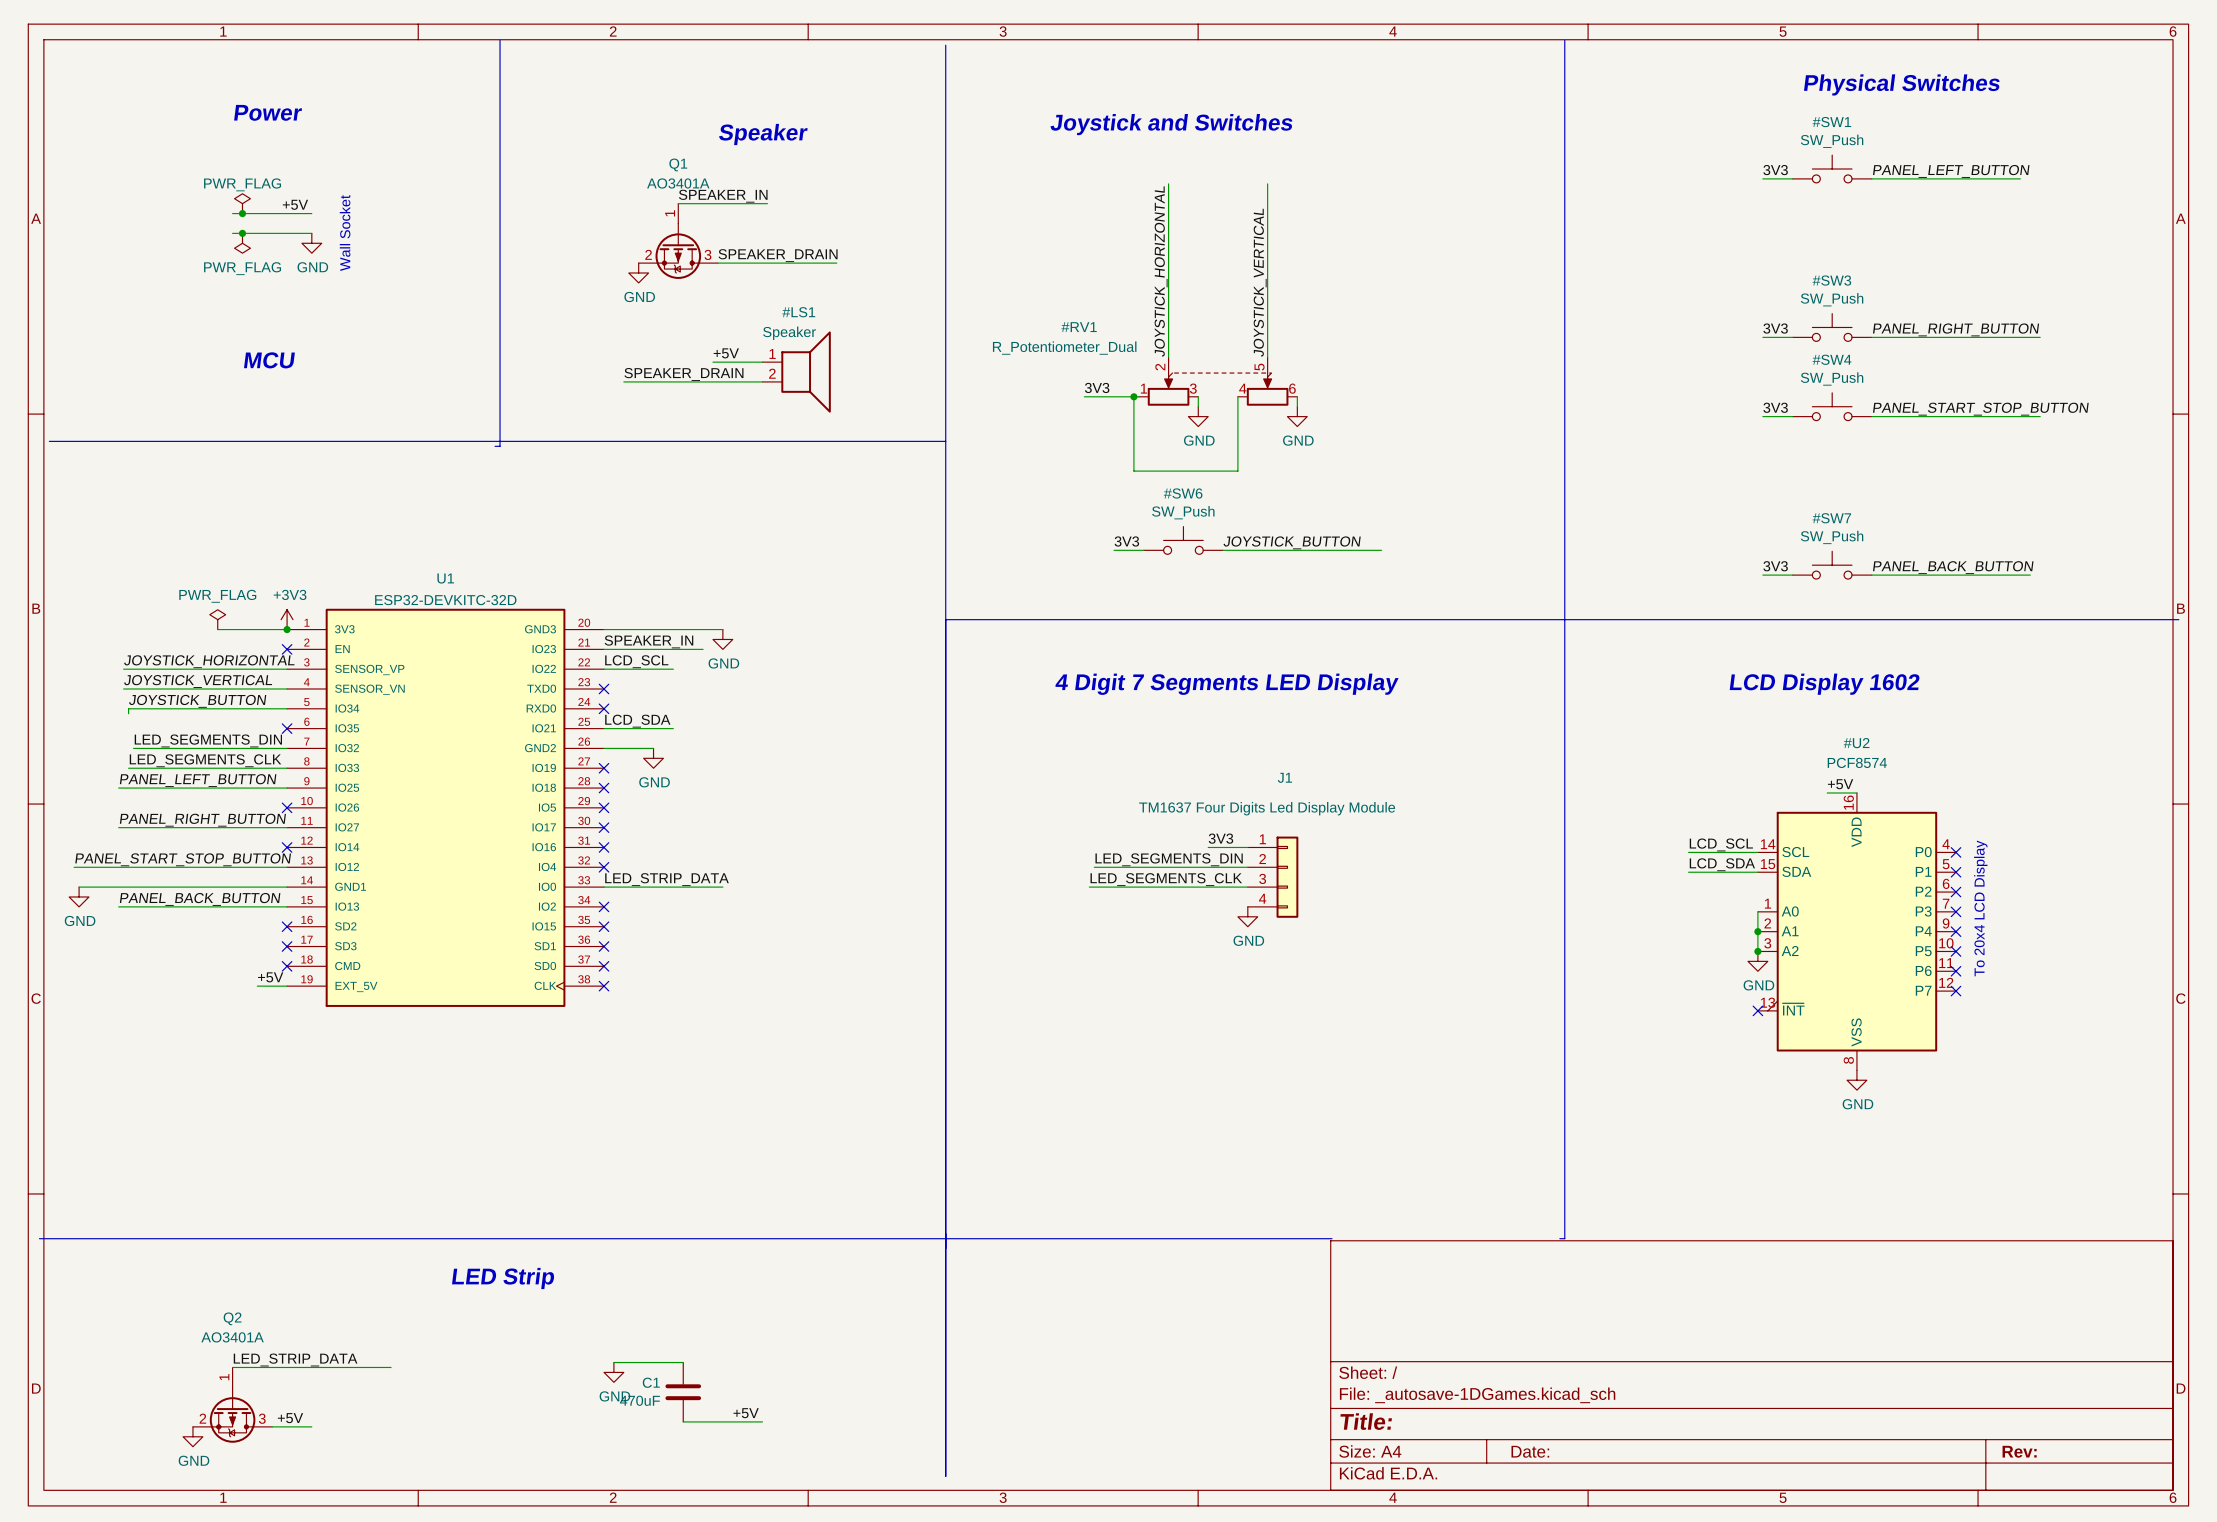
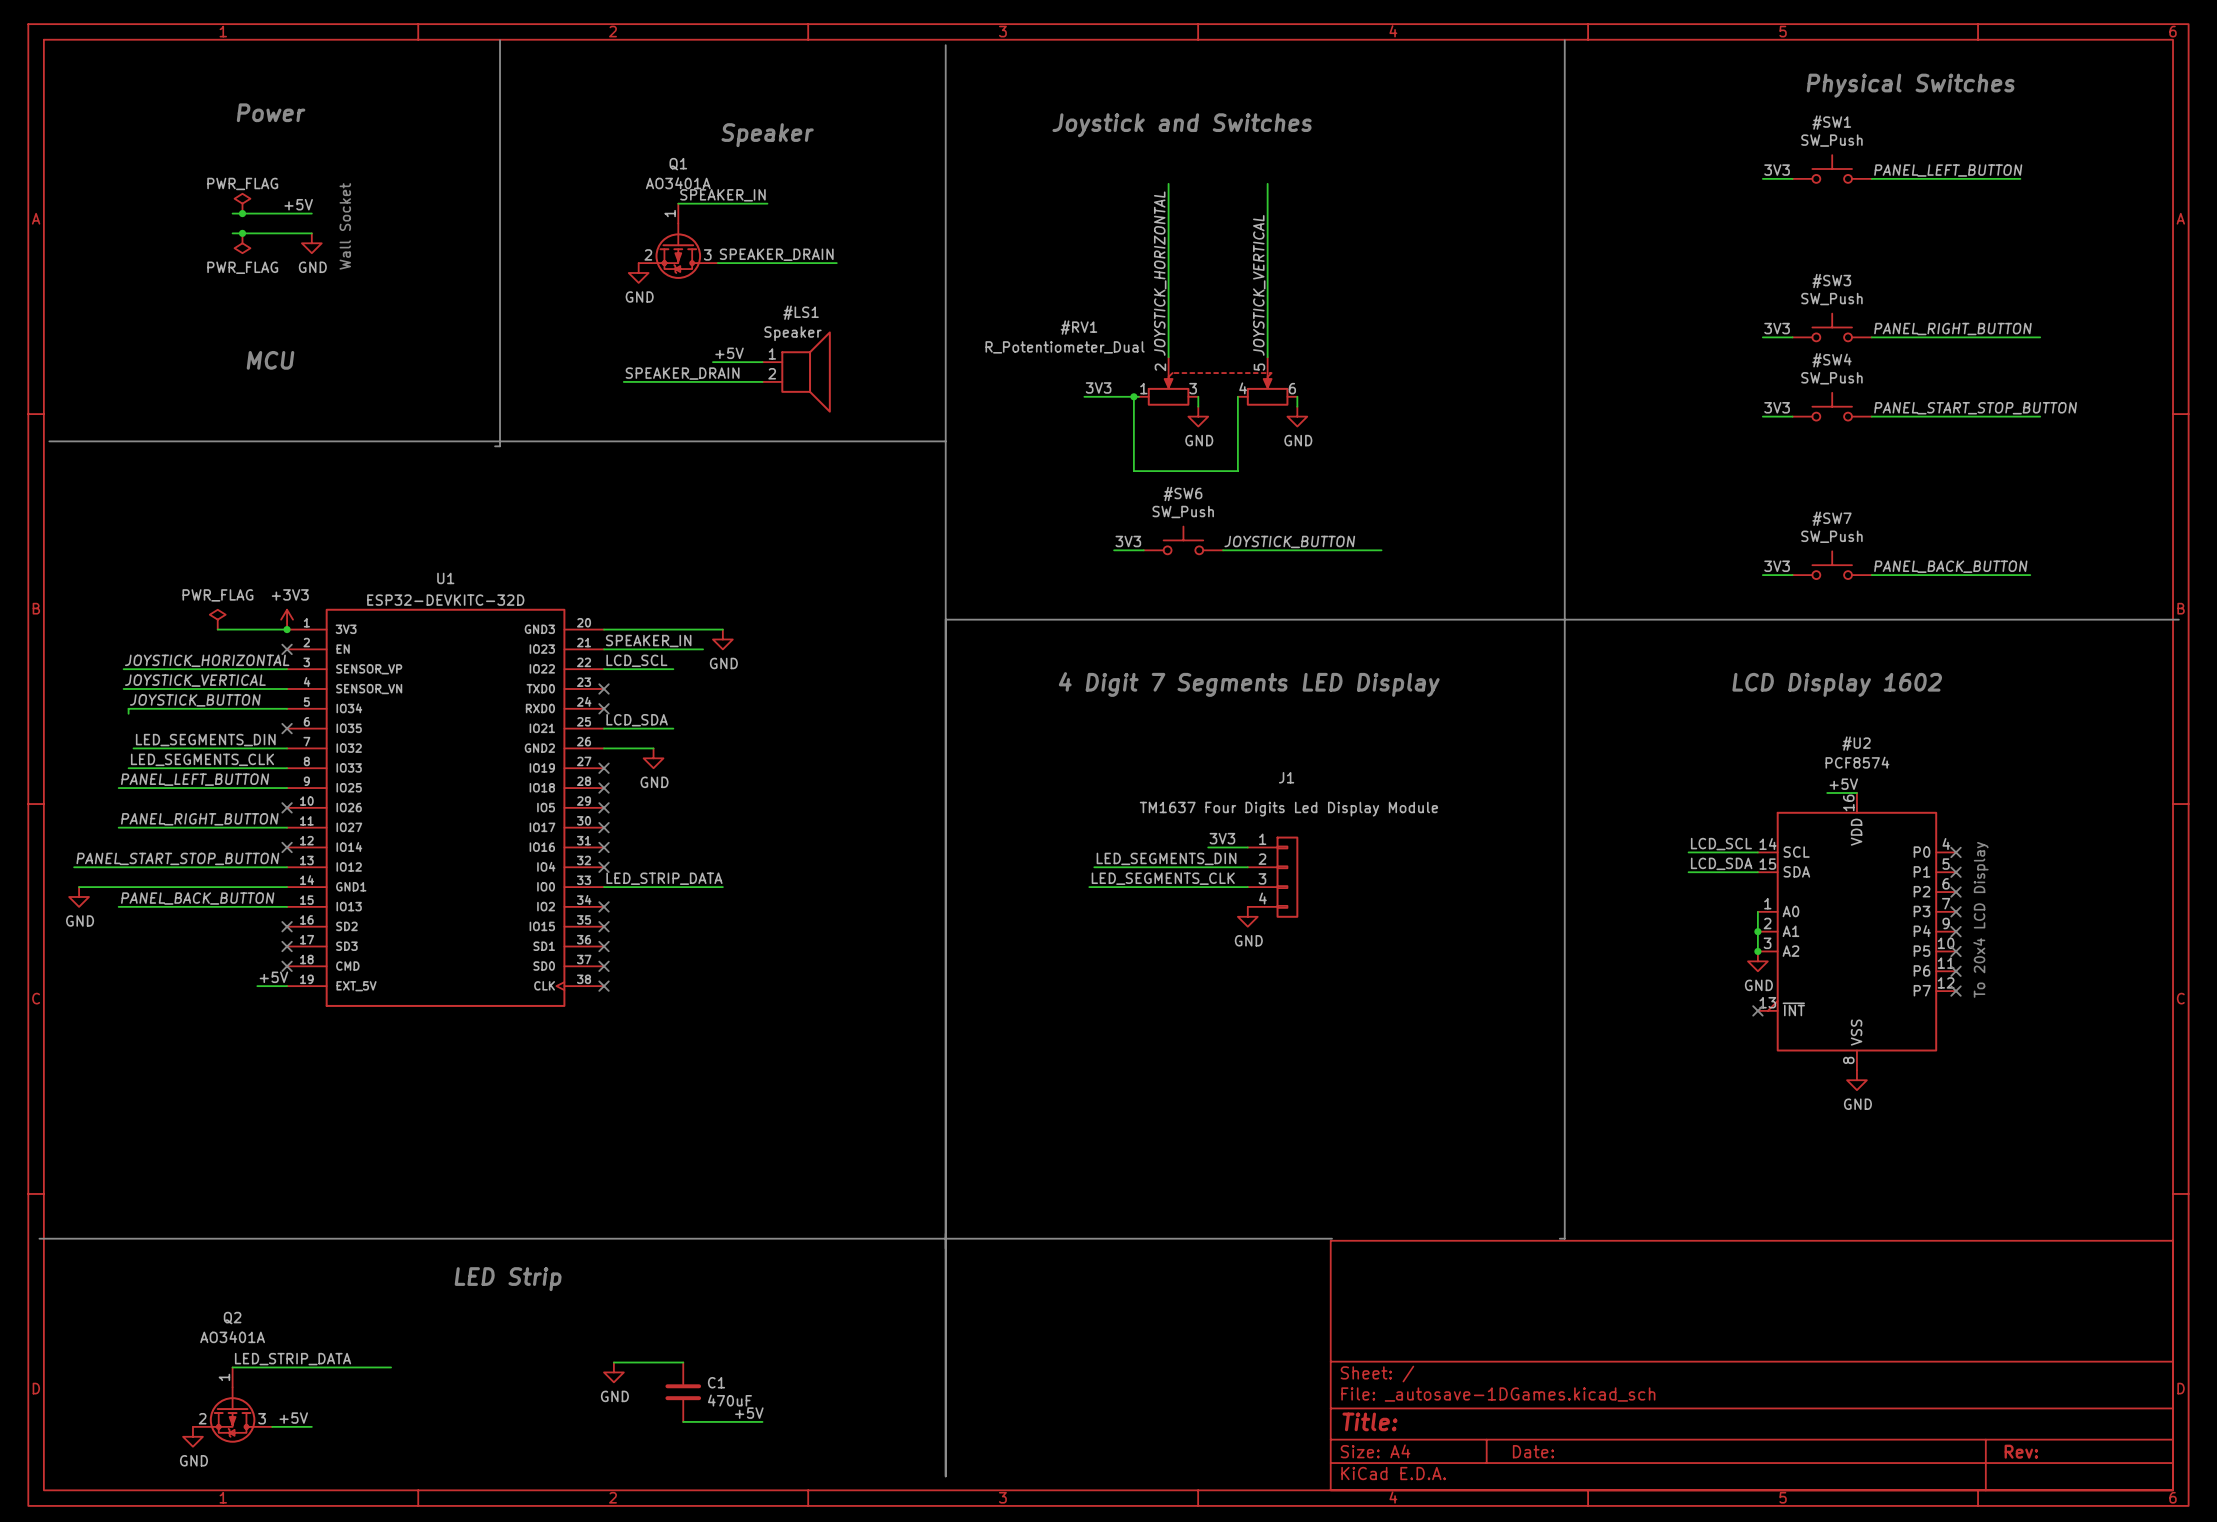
C1 name position: C1 (651, 1382) -> C1 (716, 1382)
C1 value position: 470uF (639, 1400) -> 470uF (729, 1400)

